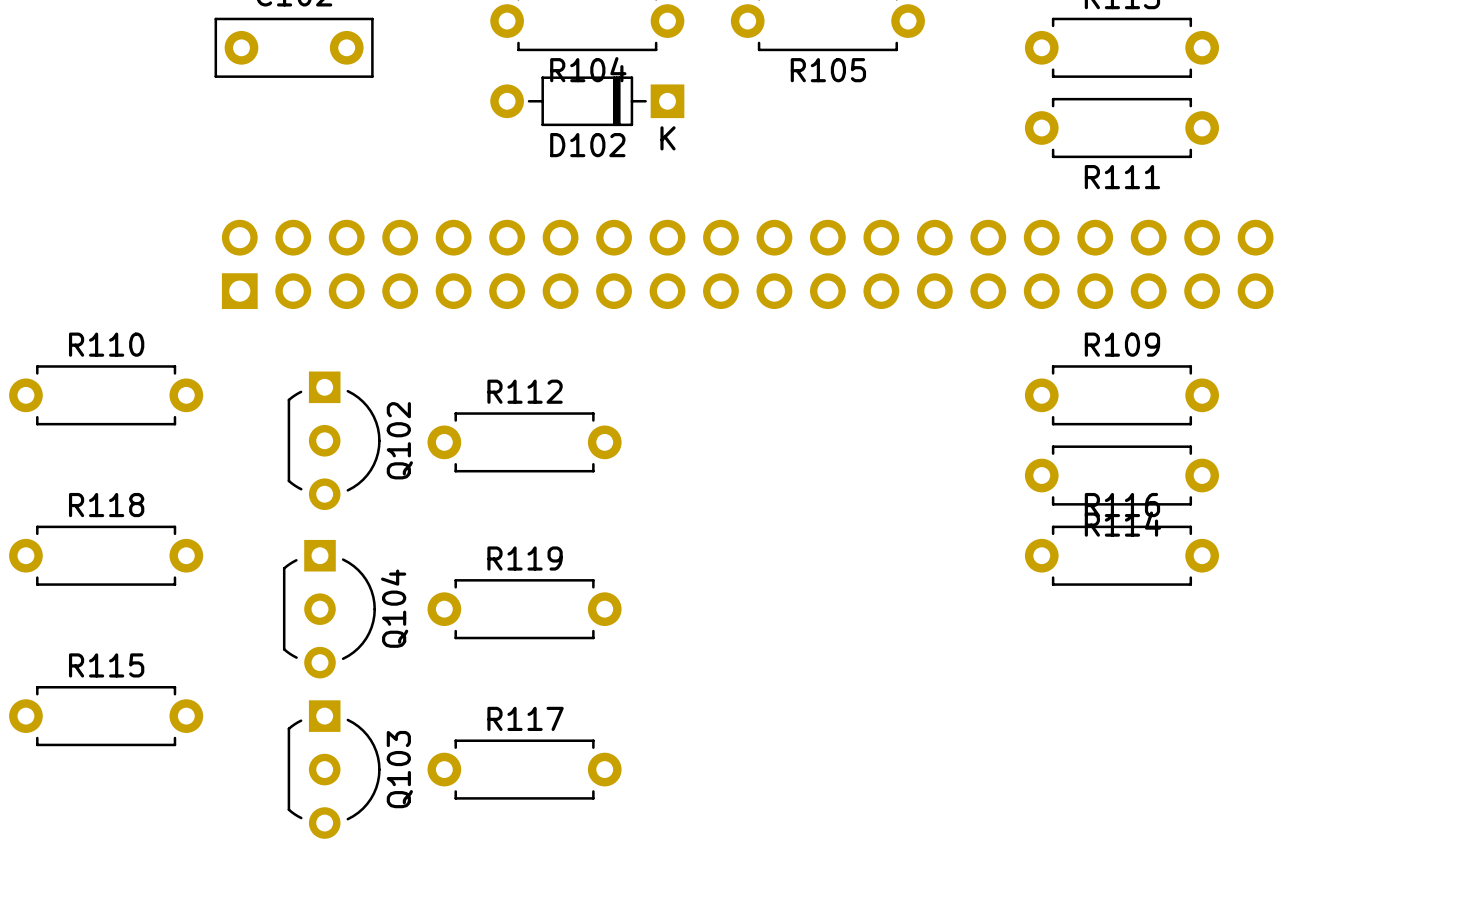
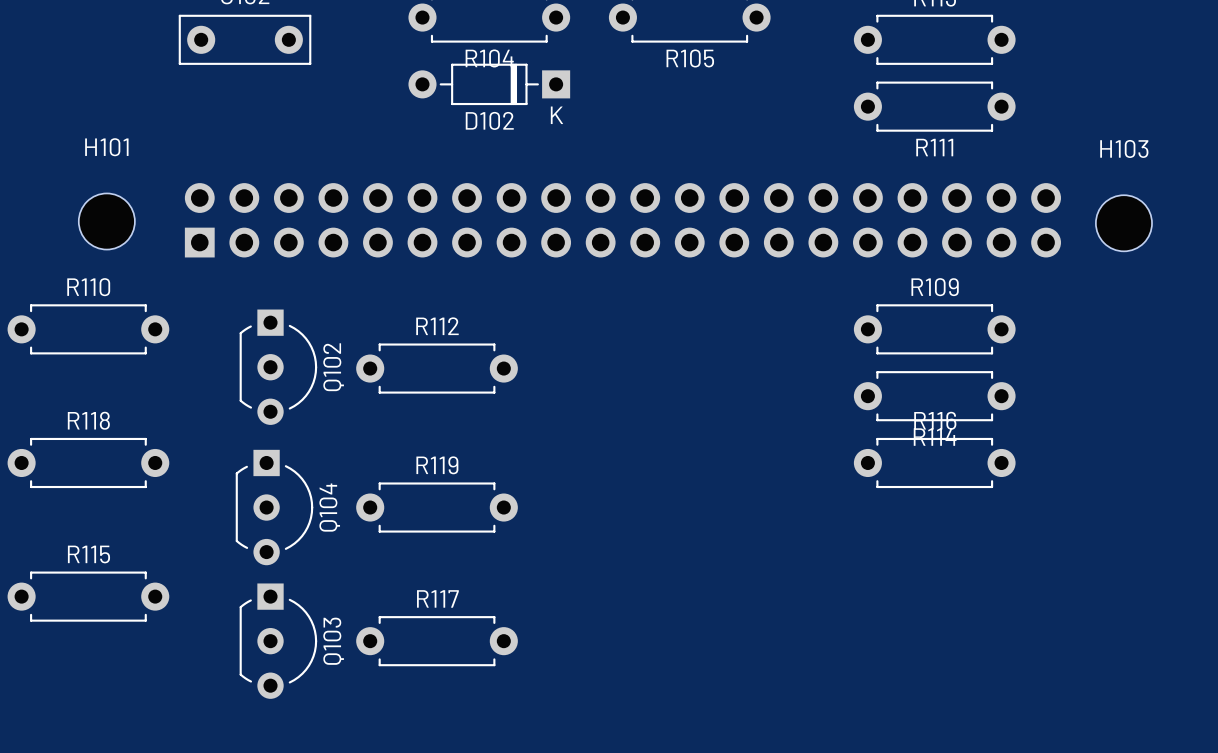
H101: none -> (106, 221)
H103: none -> (1123, 223)

